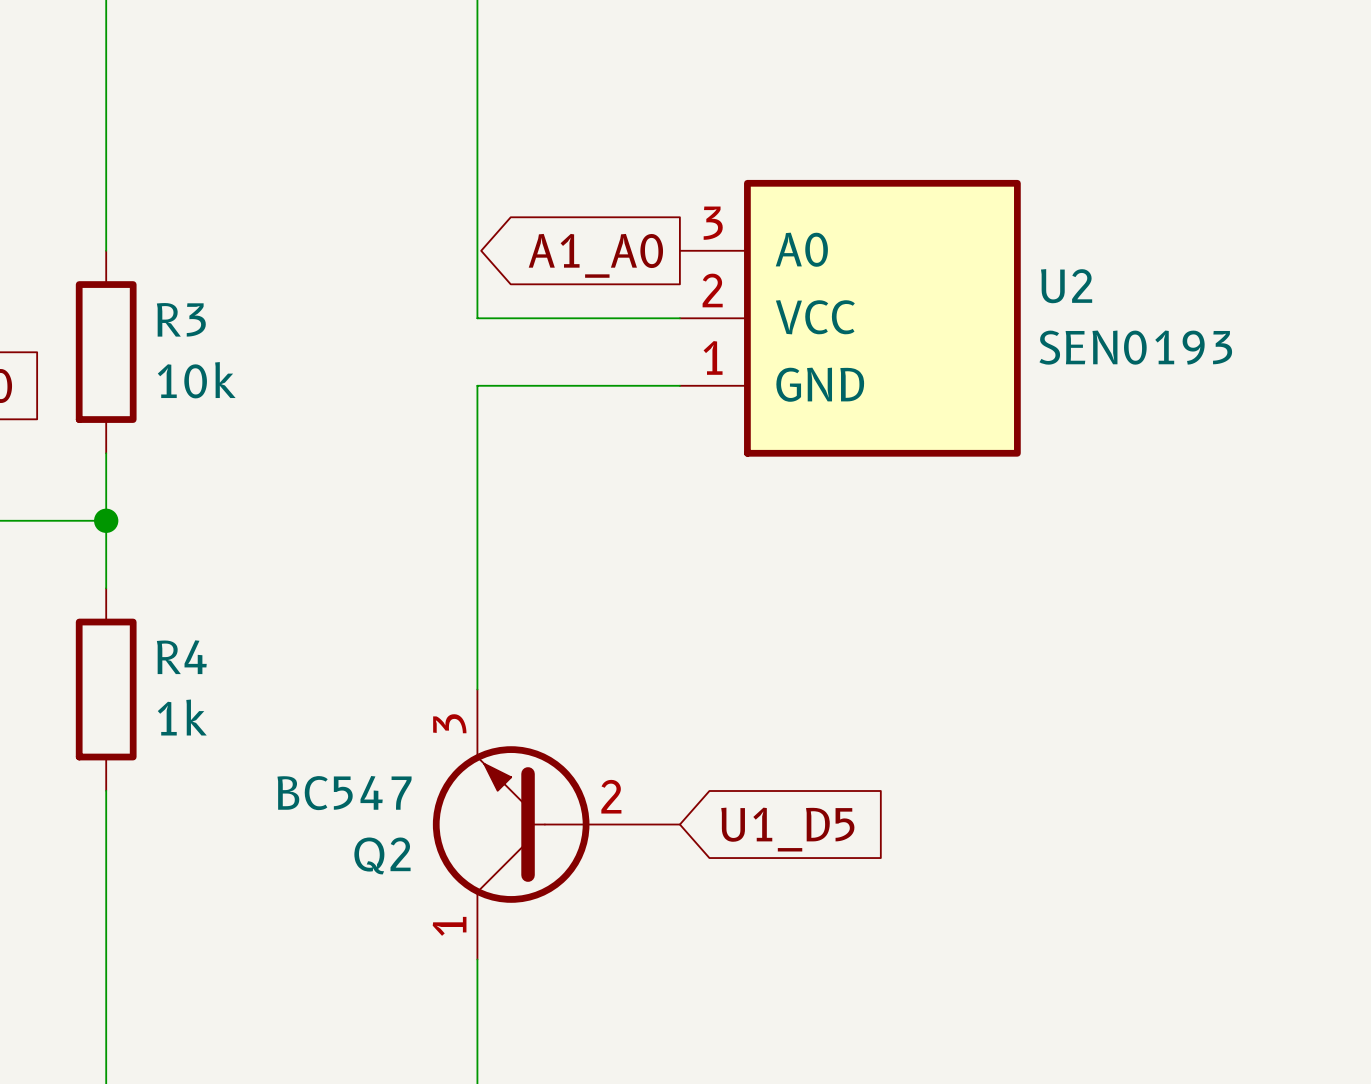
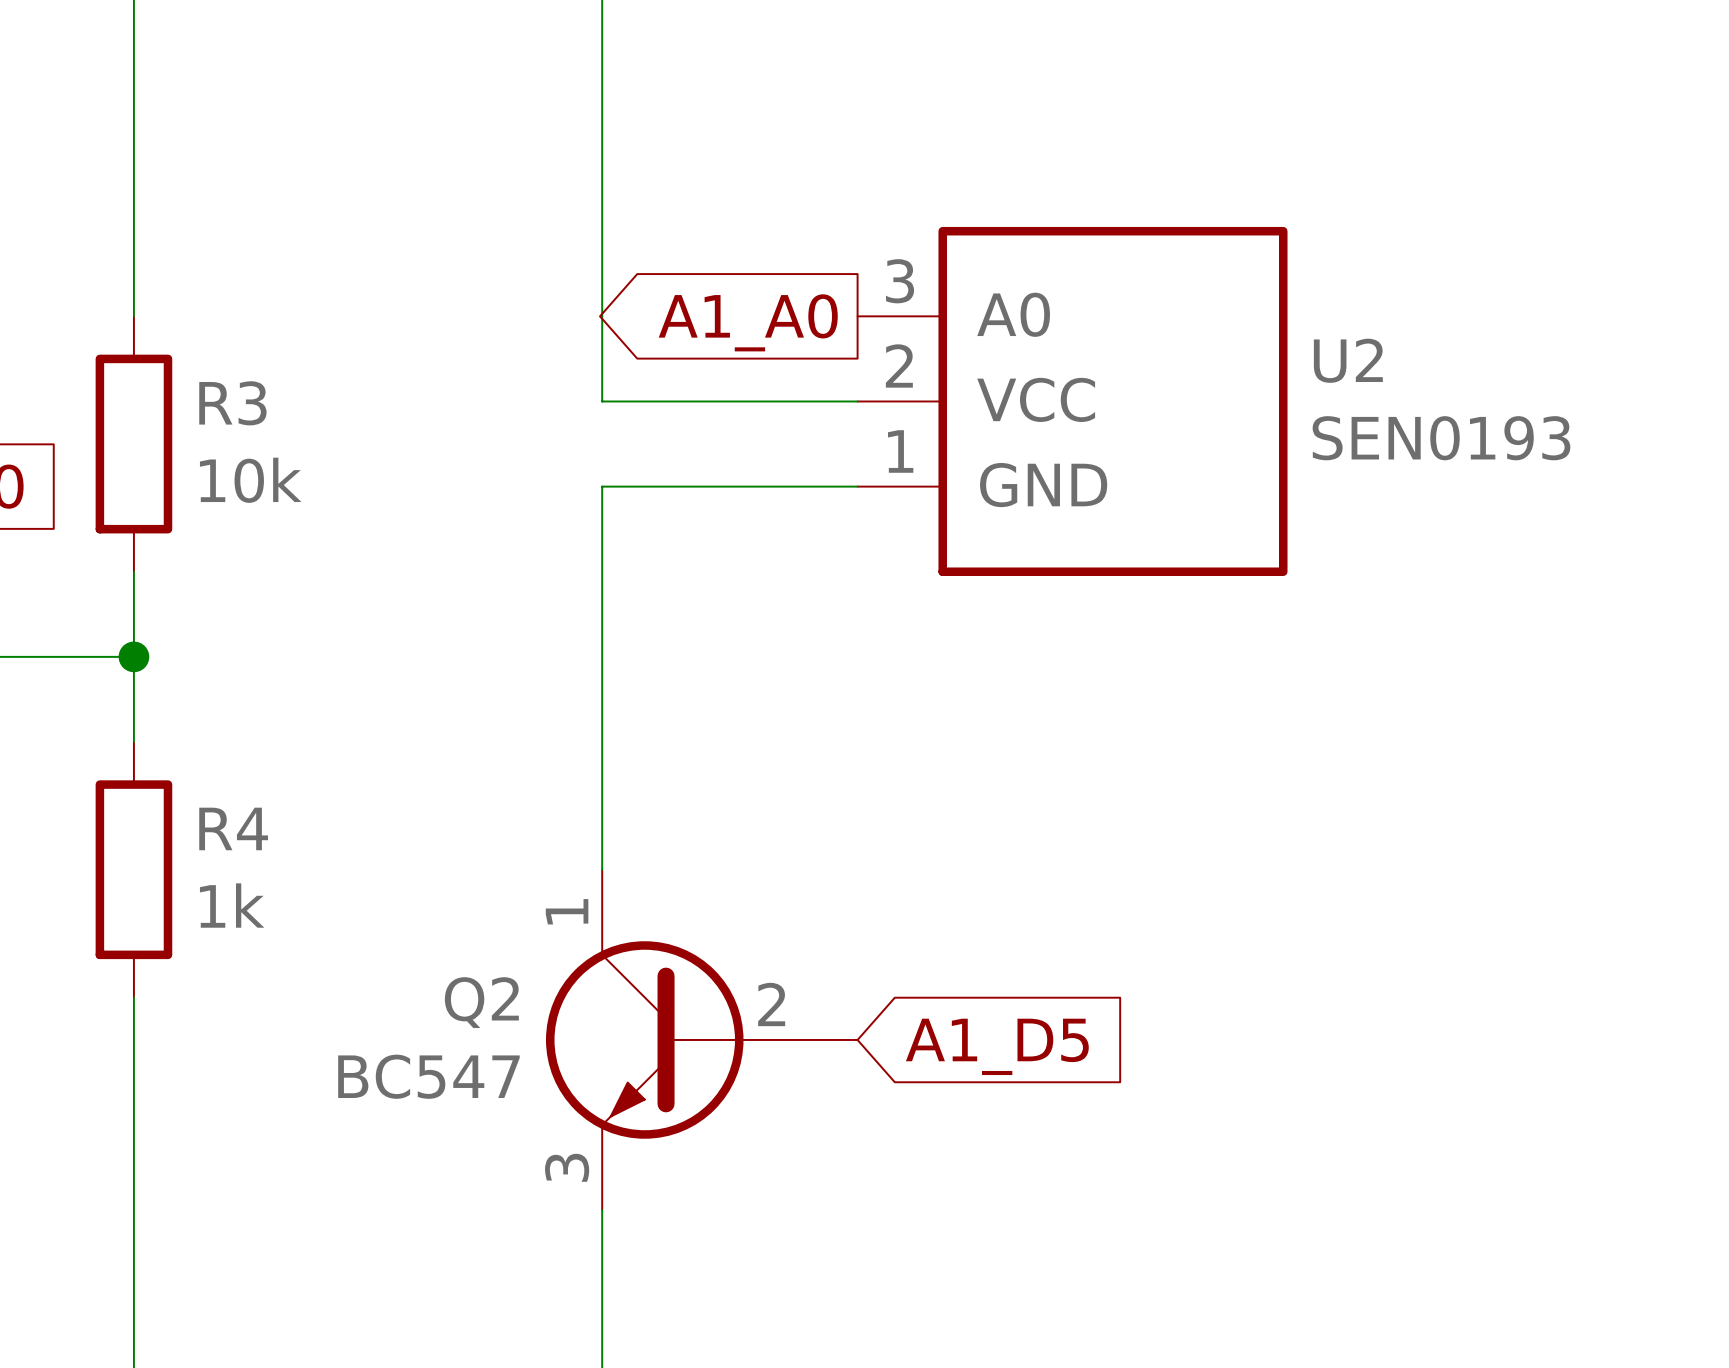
Q2 flip: as is (511, 824) -> up-down (644, 1039)
global label: U1_D5 (787, 829) -> A1_D5 (997, 1046)

